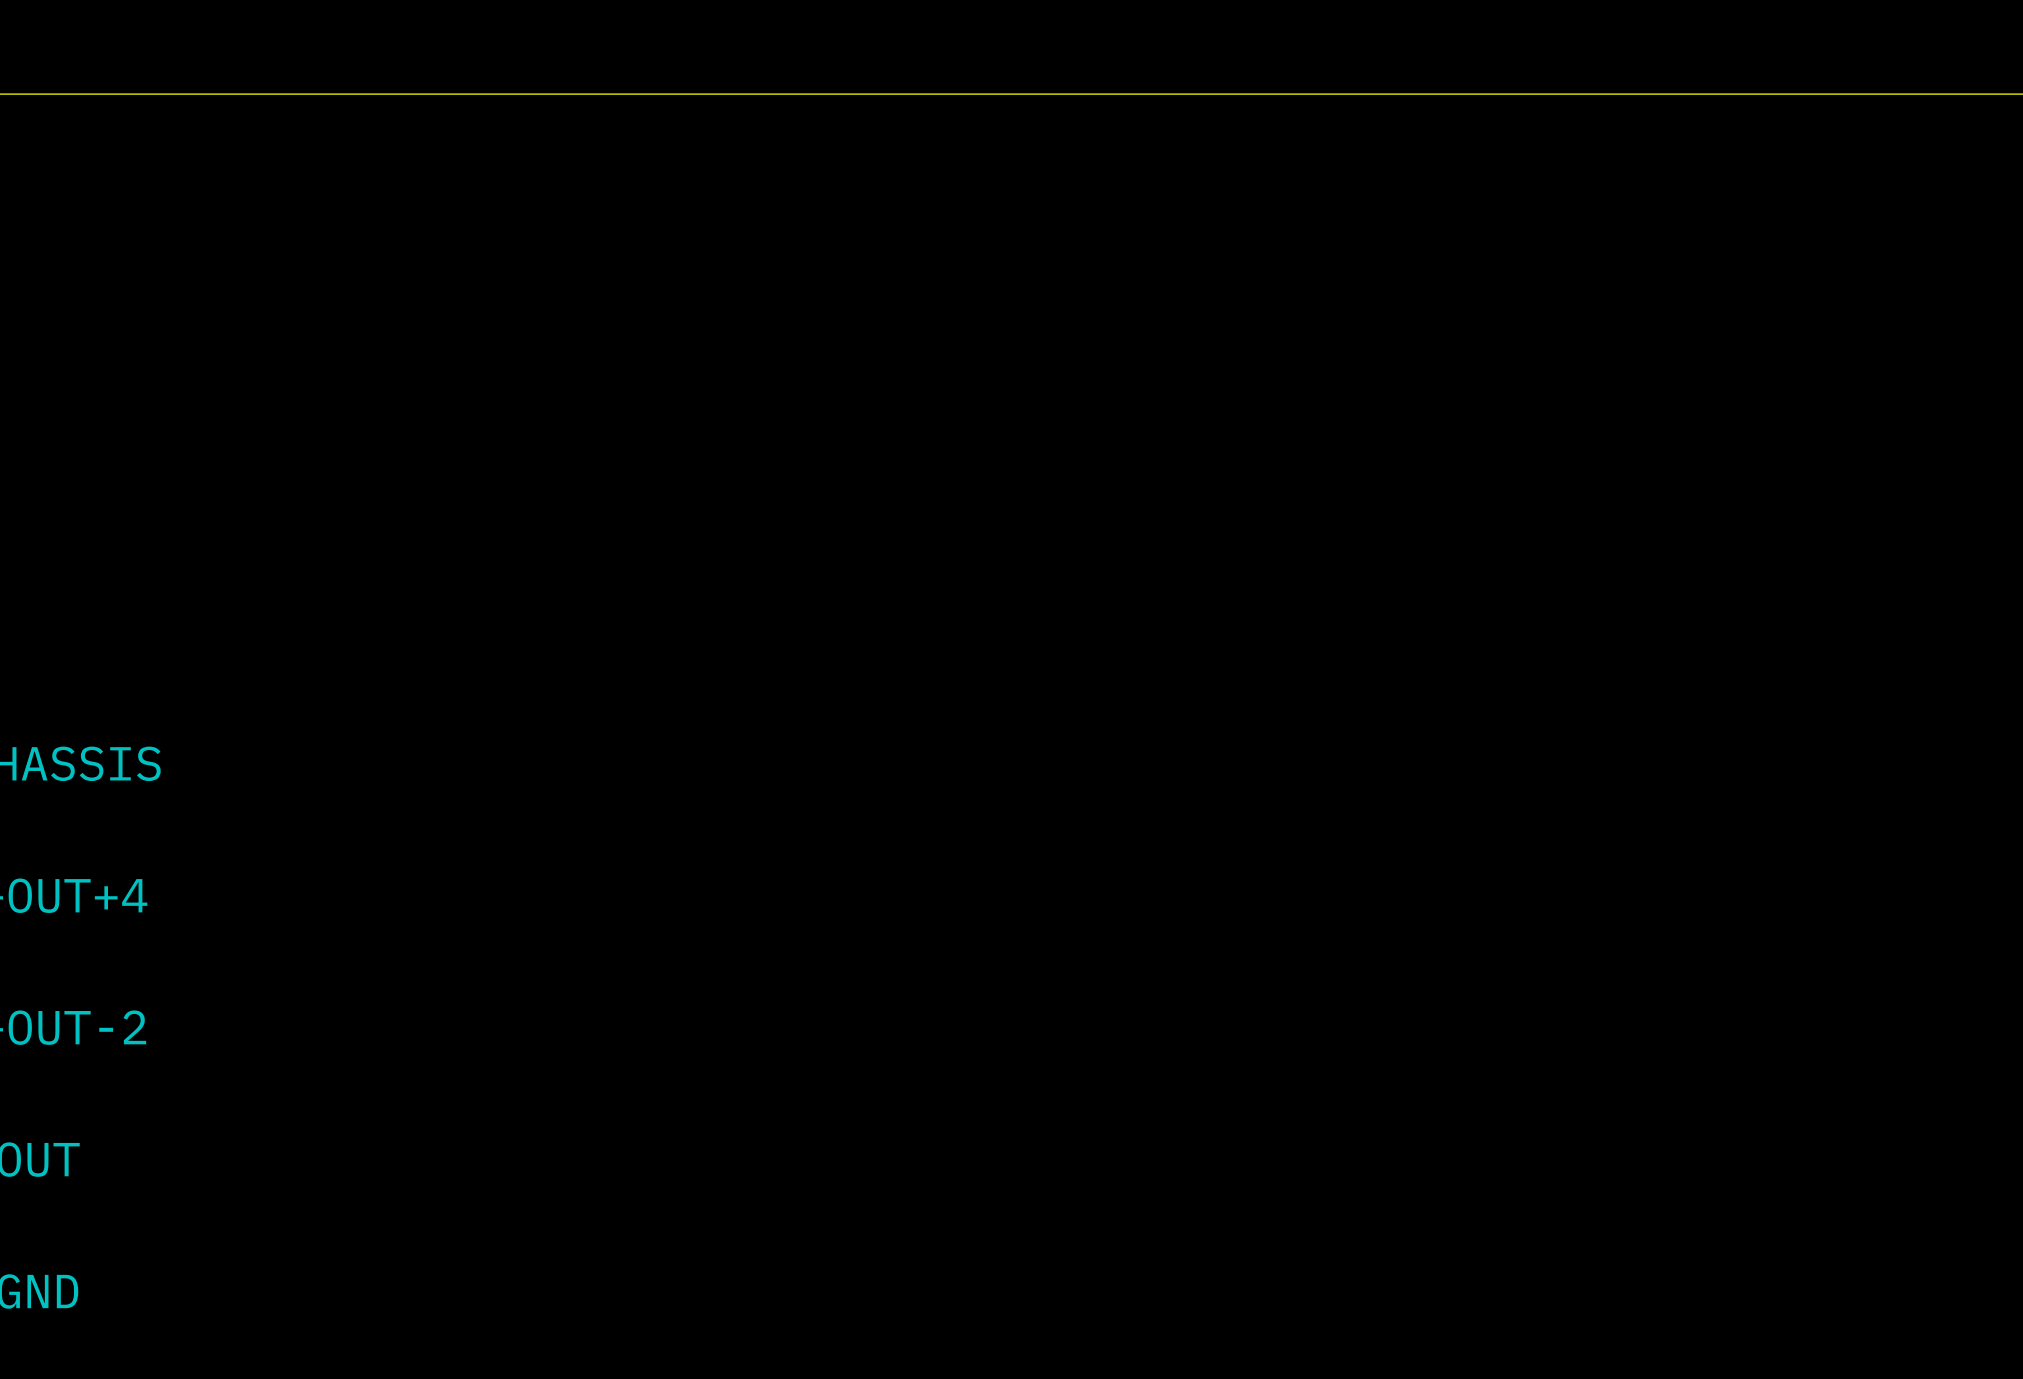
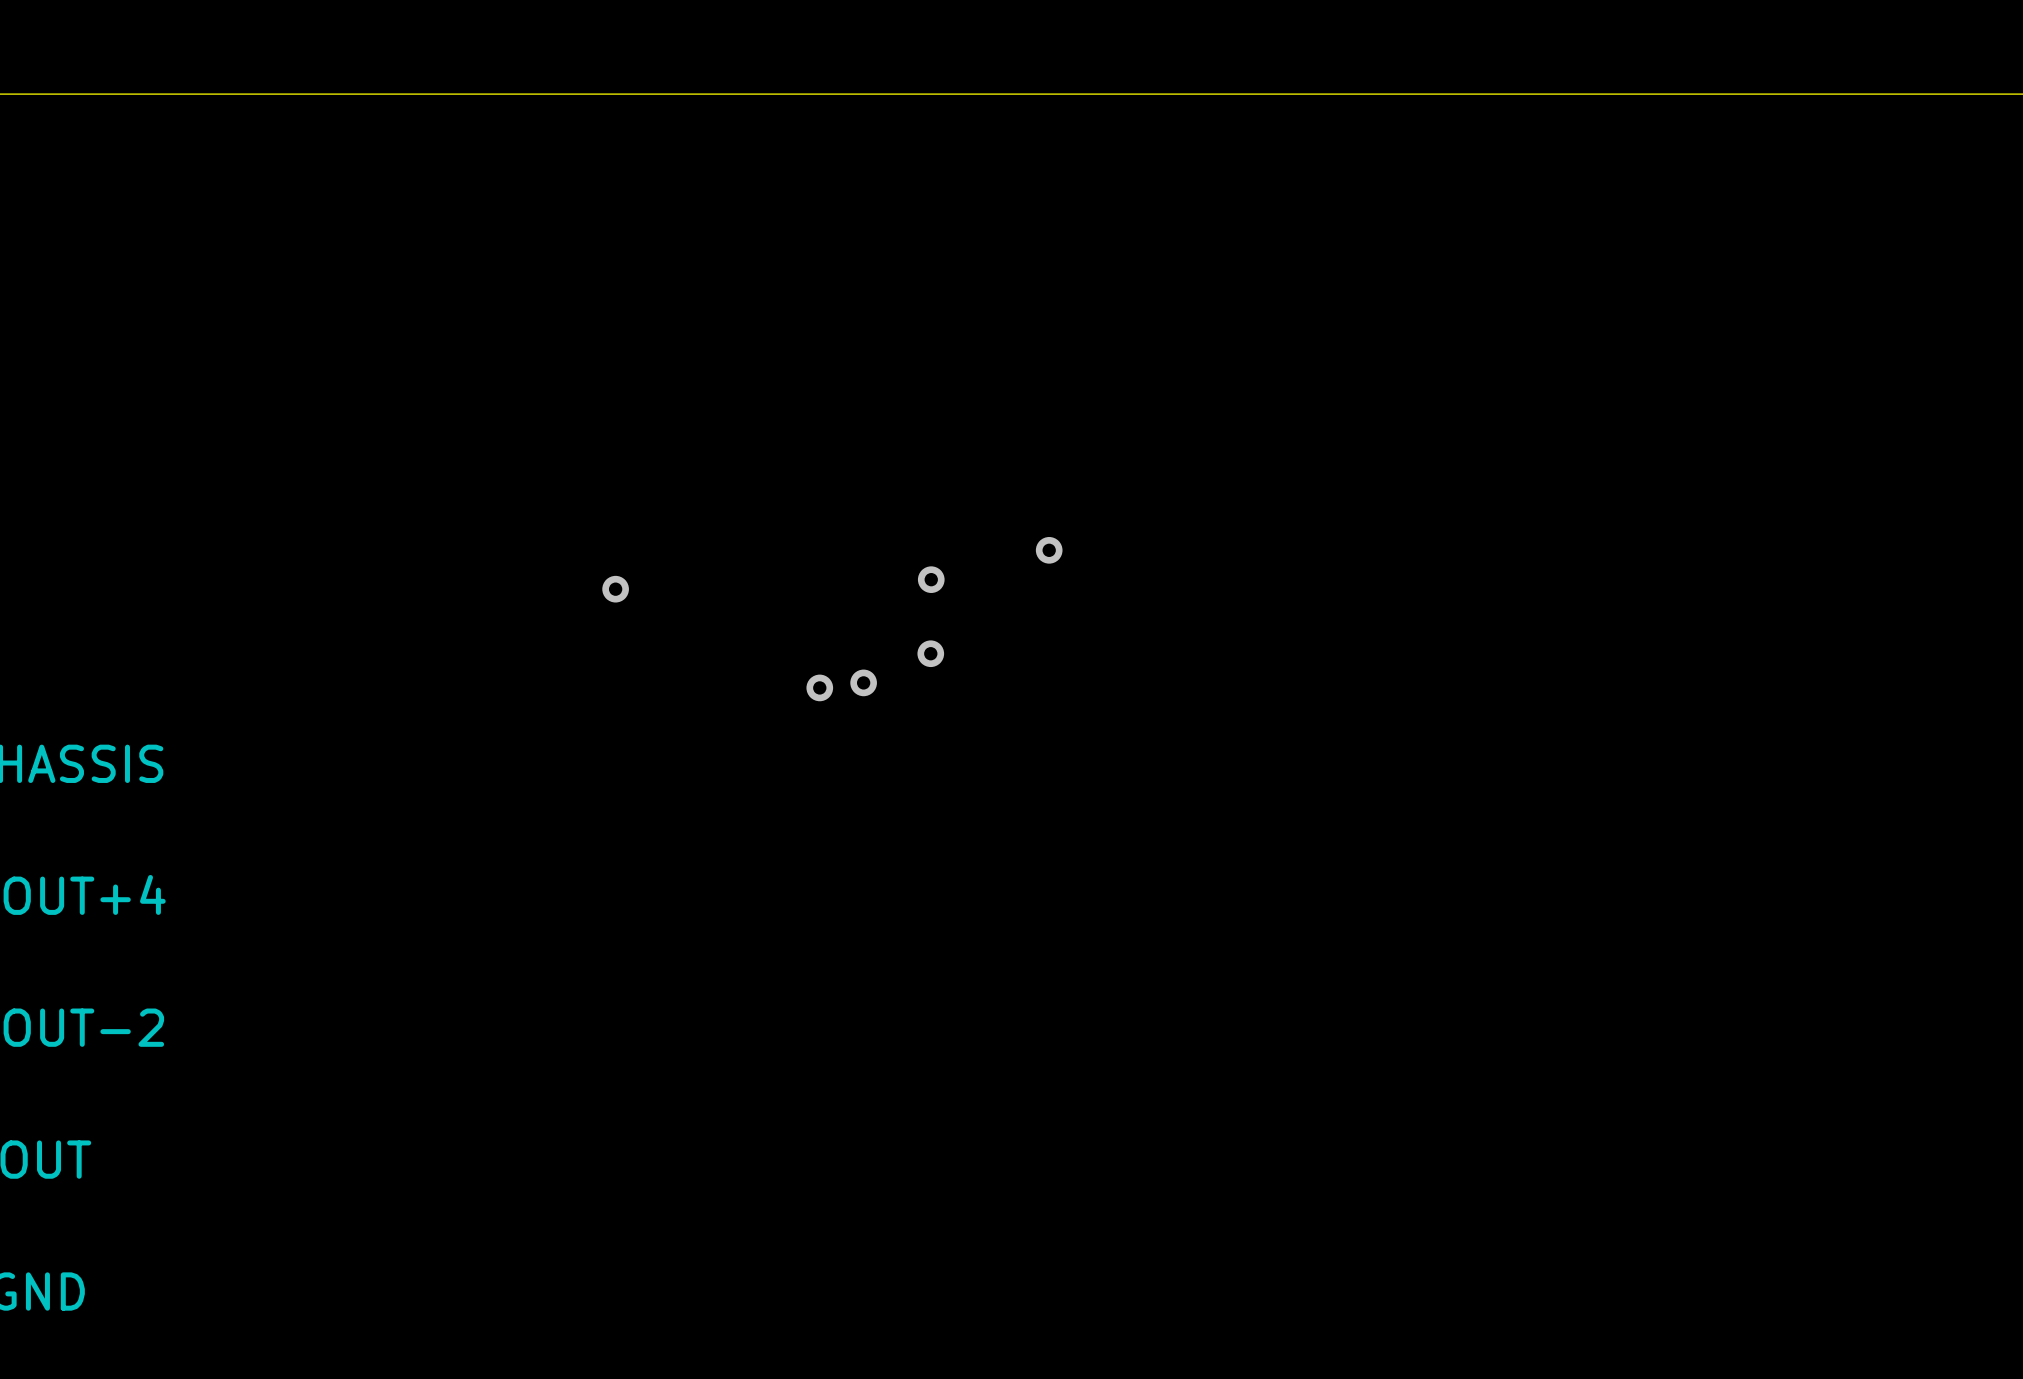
via: none -> (1049, 550)
via: none -> (931, 579)
via: none -> (615, 589)
via: none -> (930, 653)
via: none -> (863, 682)
via: none -> (819, 687)

